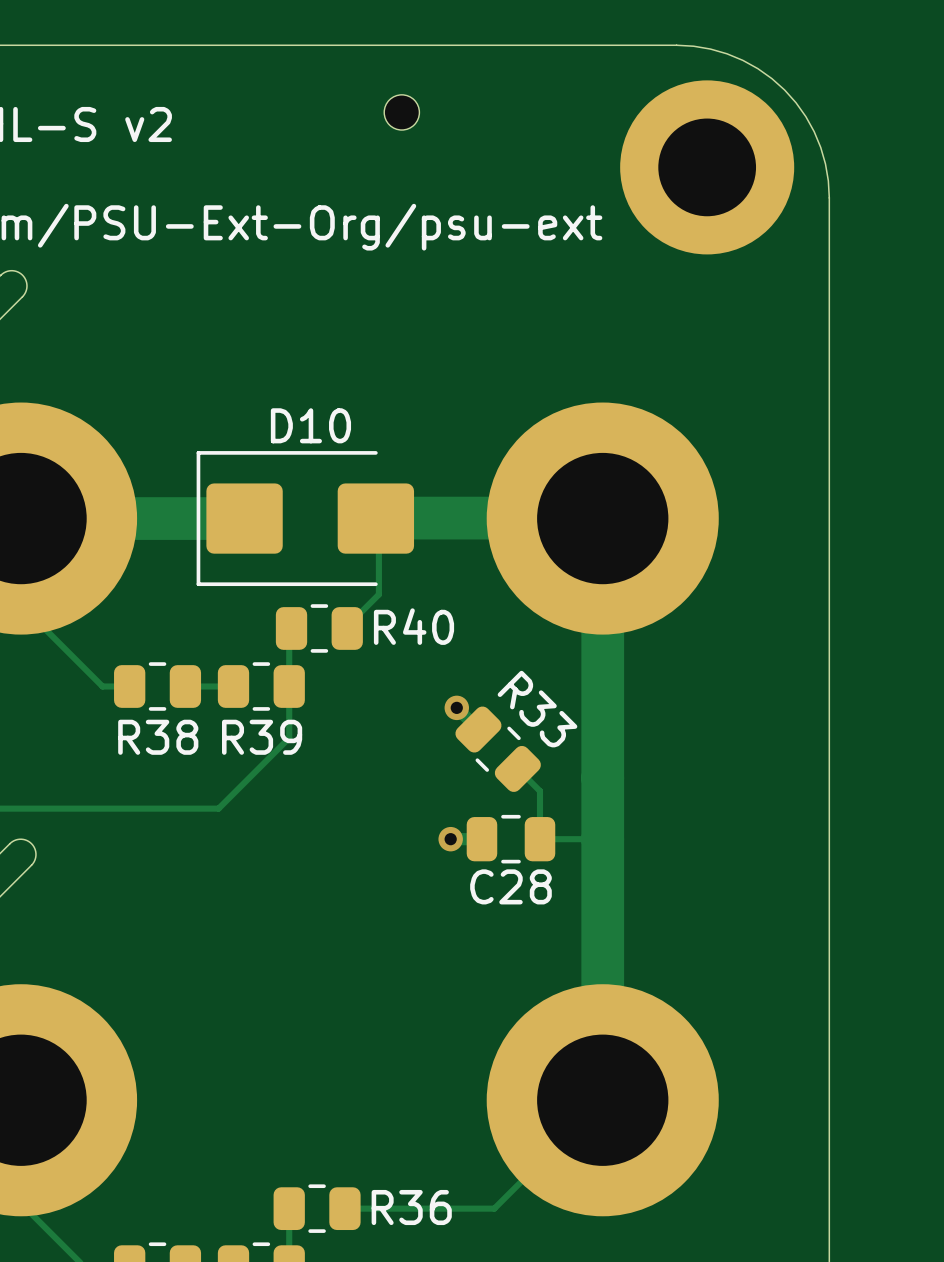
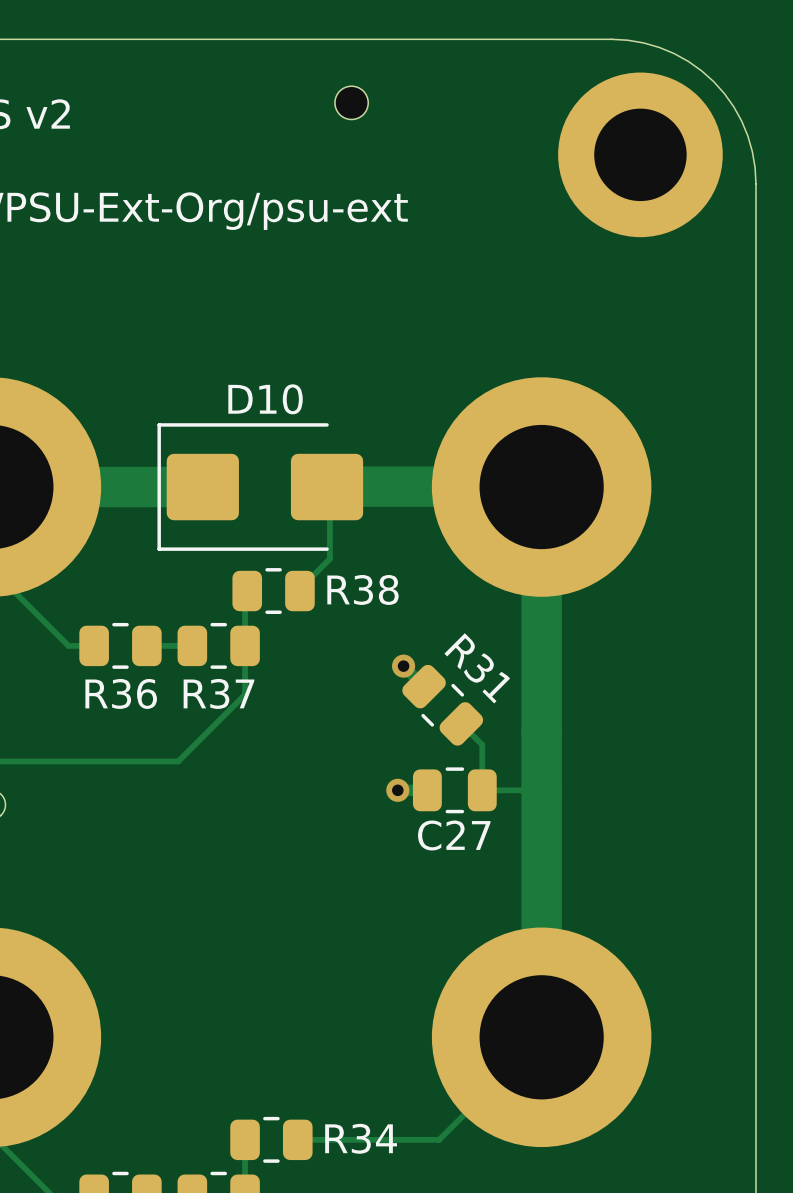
R40 name: R40 (414, 626) -> R38 (363, 589)
R33 name: R33 (537, 709) -> R31 (477, 668)
R38 name: R38 (158, 737) -> R36 (121, 693)
R39 name: R39 (262, 737) -> R37 (218, 693)
C28 name: C28 (510, 886) -> C27 (454, 835)
R36 name: R36 (411, 1207) -> R34 (361, 1138)

